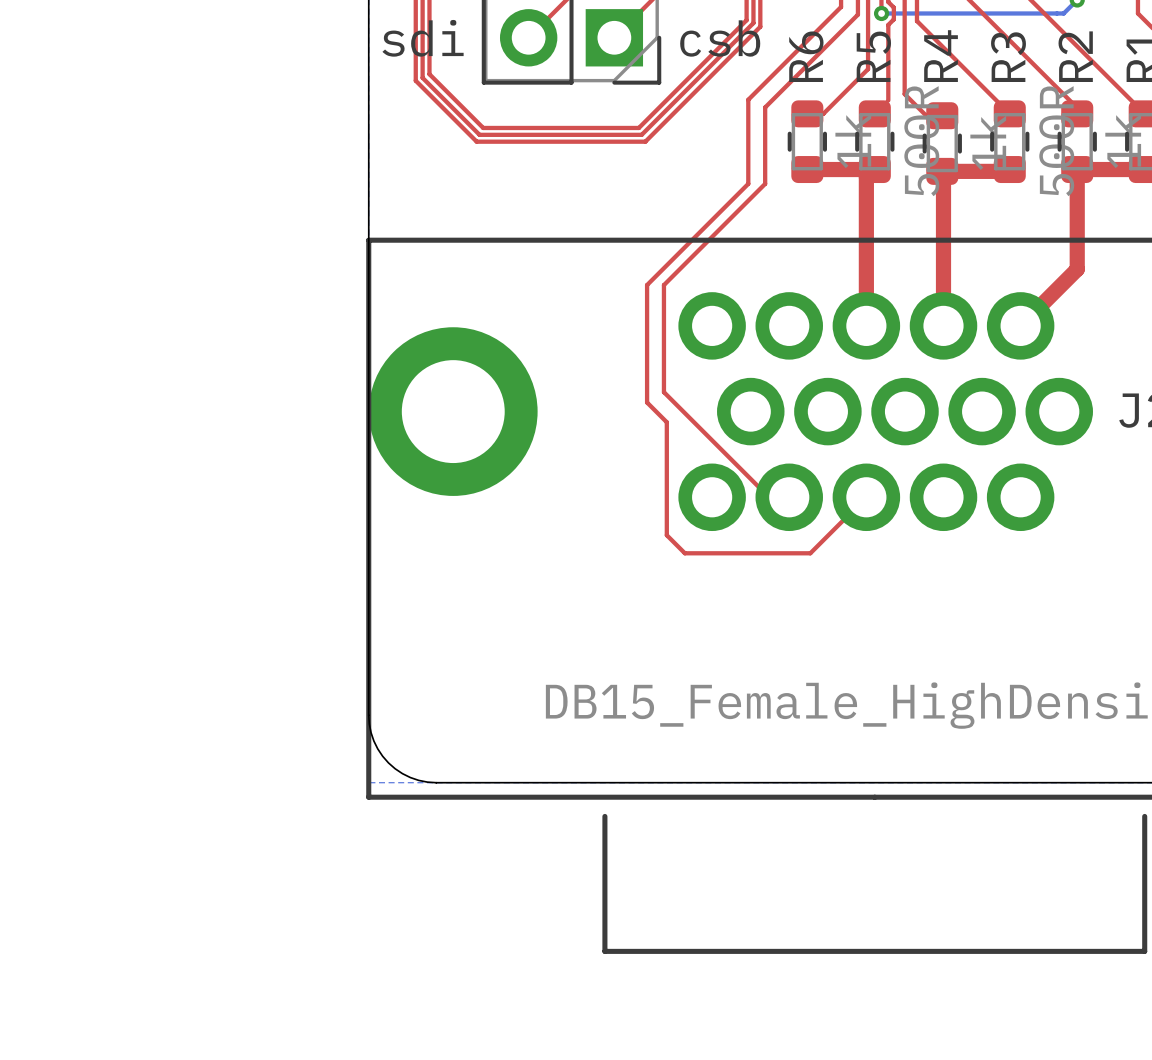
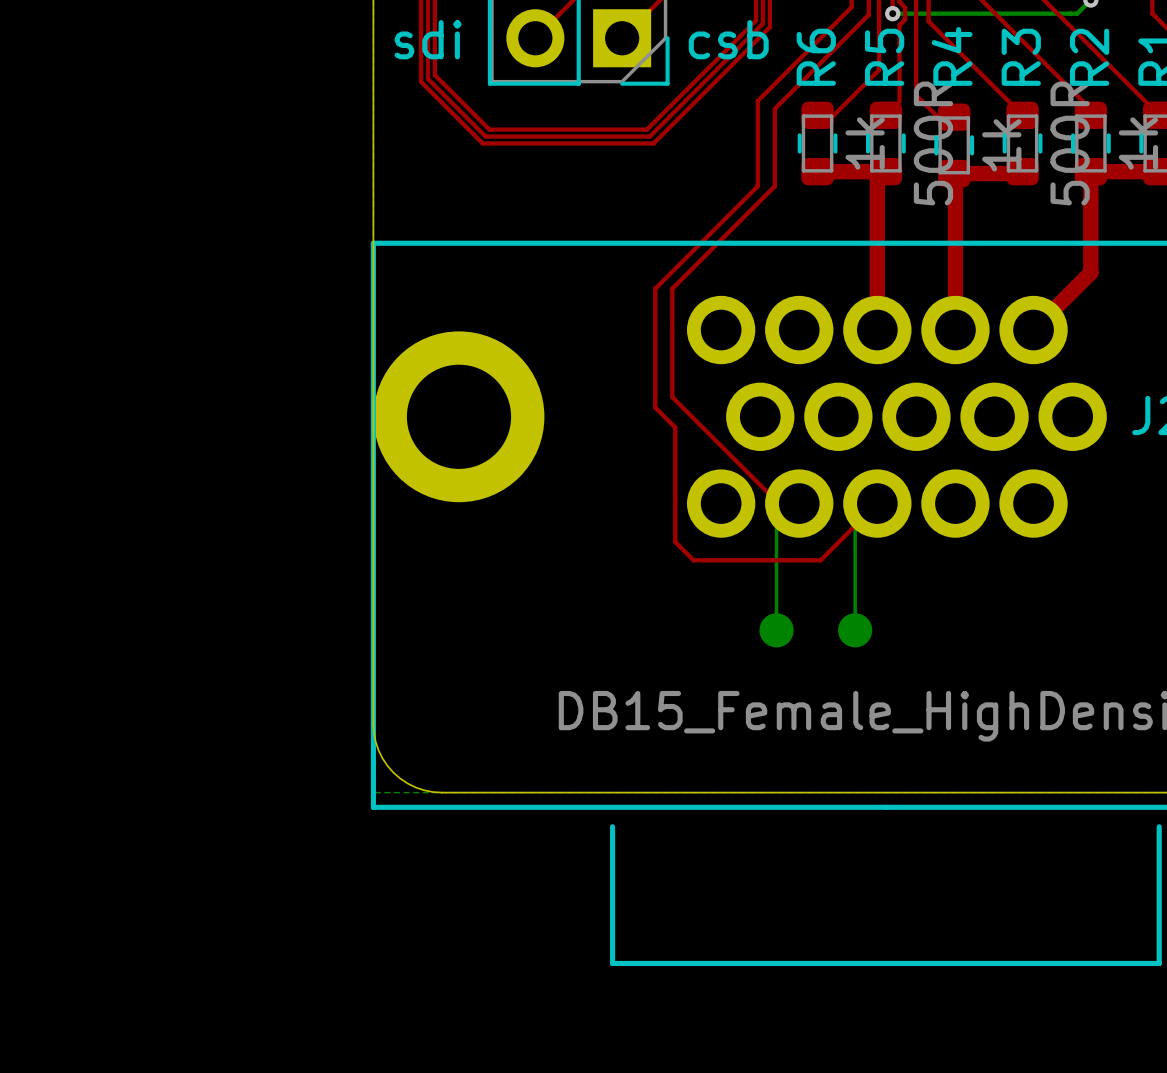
bottom track: none -> (799, 503) (776, 526) (776, 630)
bottom track: none -> (877, 503) (855, 525) (855, 630)
part: none -> (776, 630)
part: none -> (855, 630)

